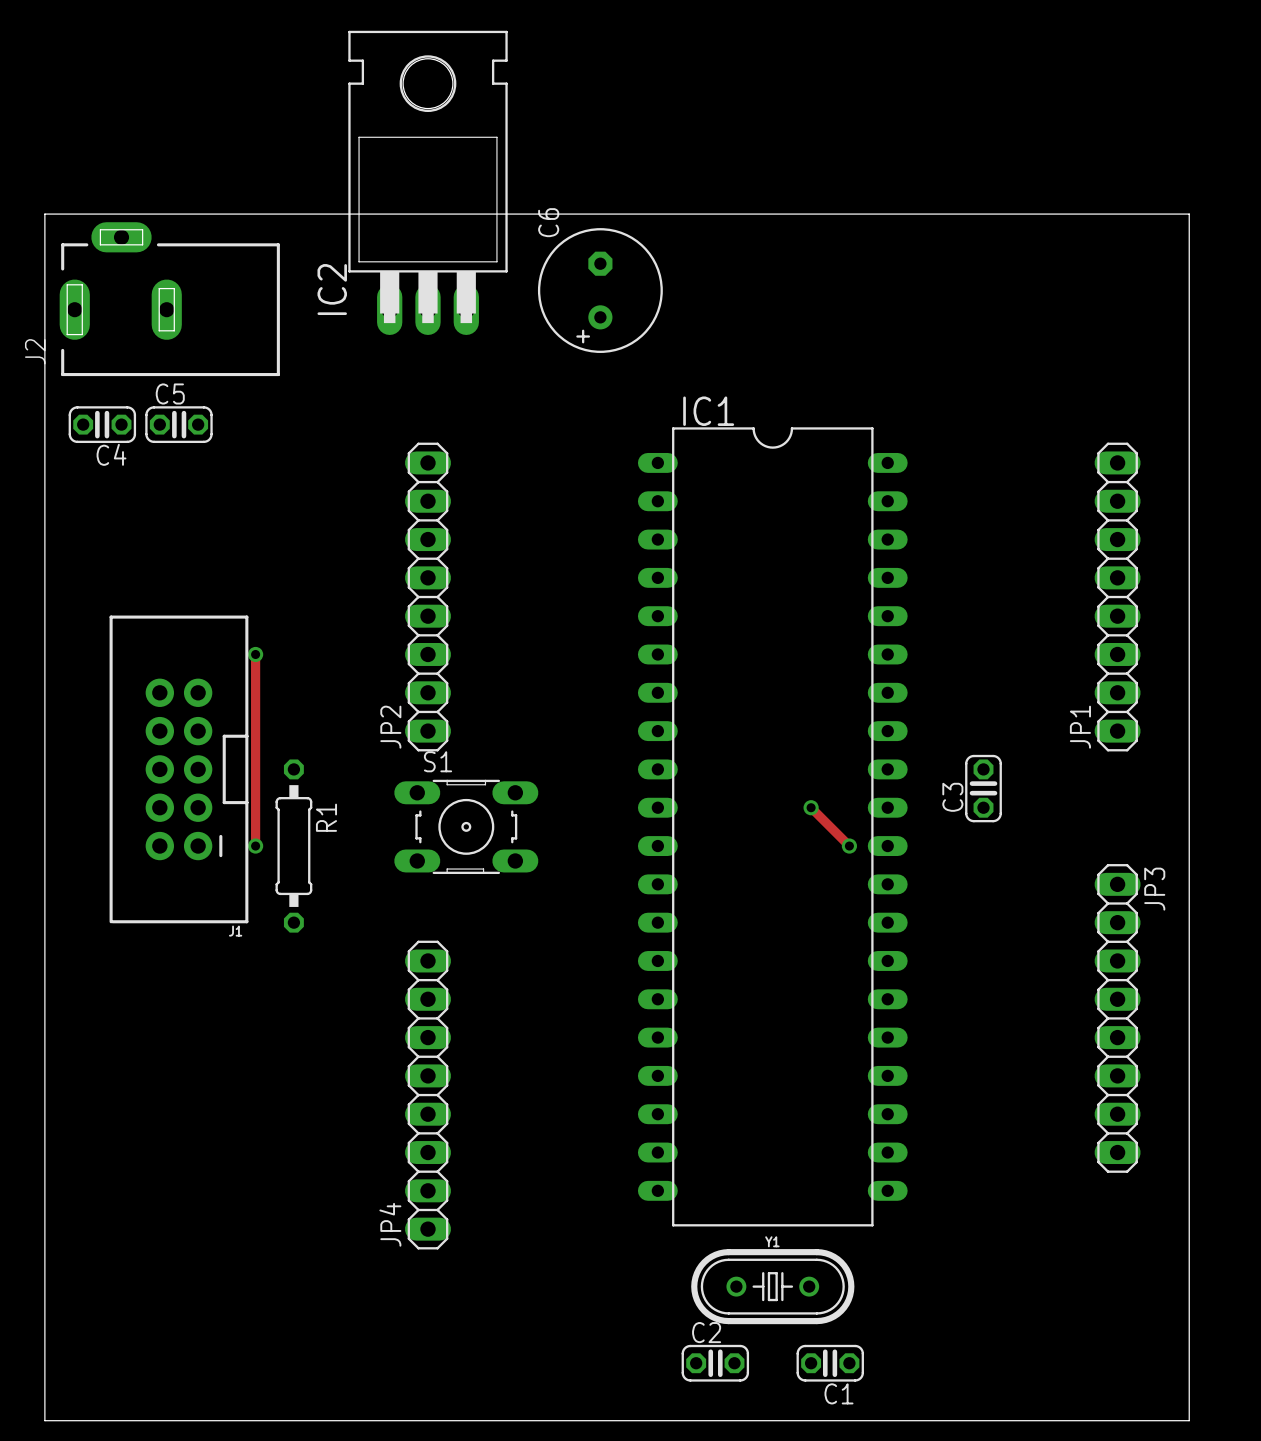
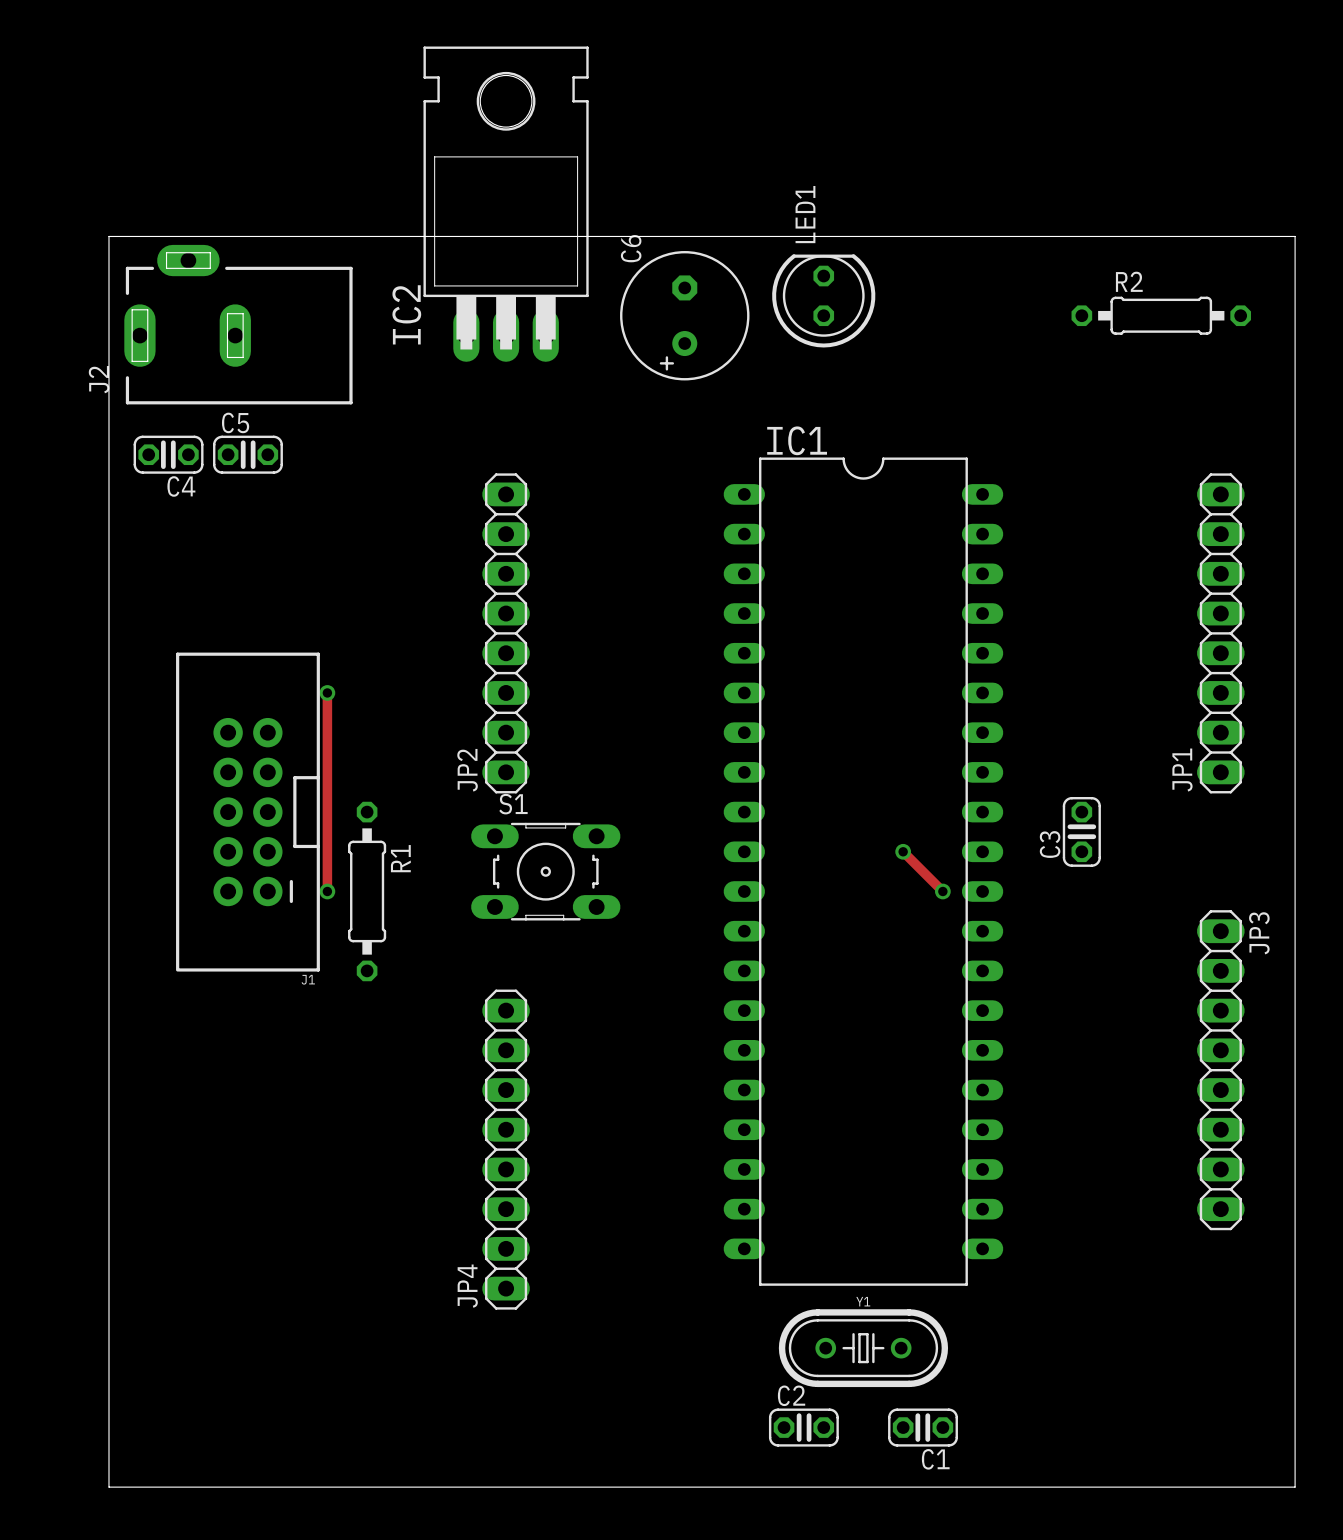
LED1: none -> (823, 300)
R2: none -> (1161, 315)

